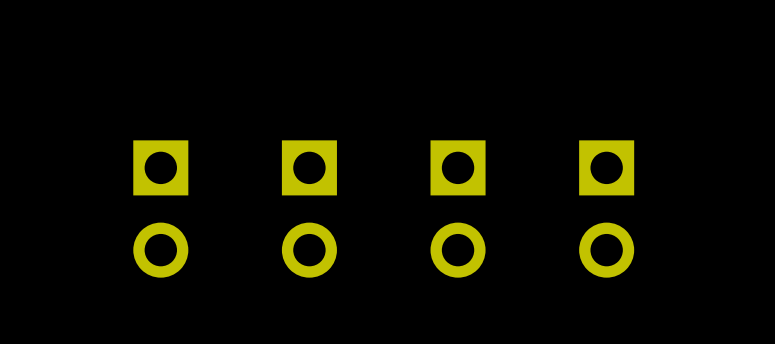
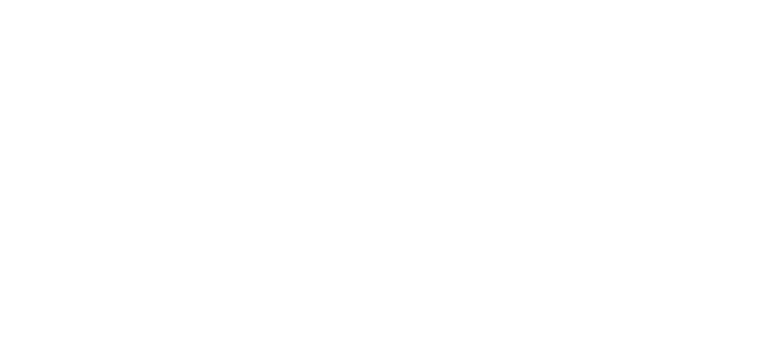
part: (160, 209) -> none
part: (309, 209) -> none
part: (458, 209) -> none
part: (606, 209) -> none

